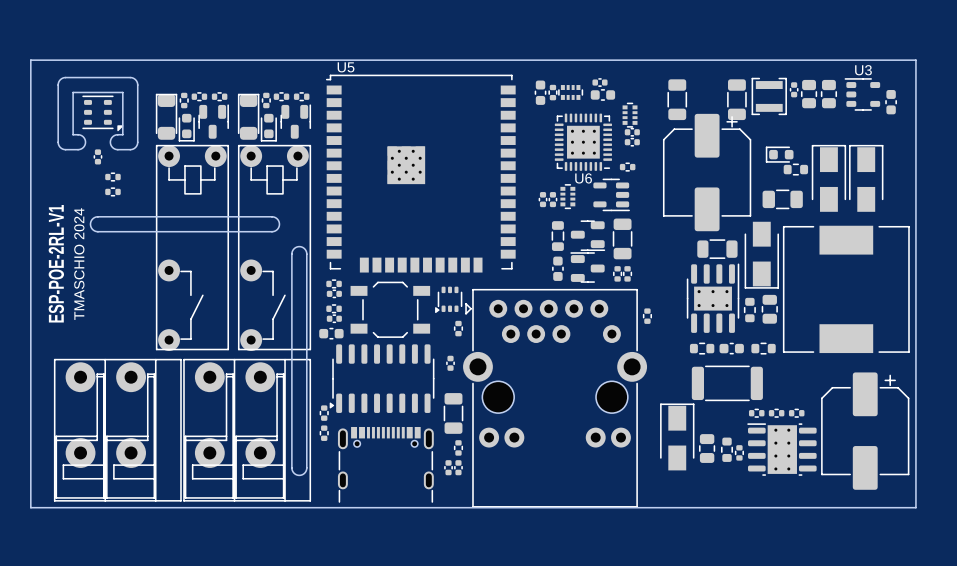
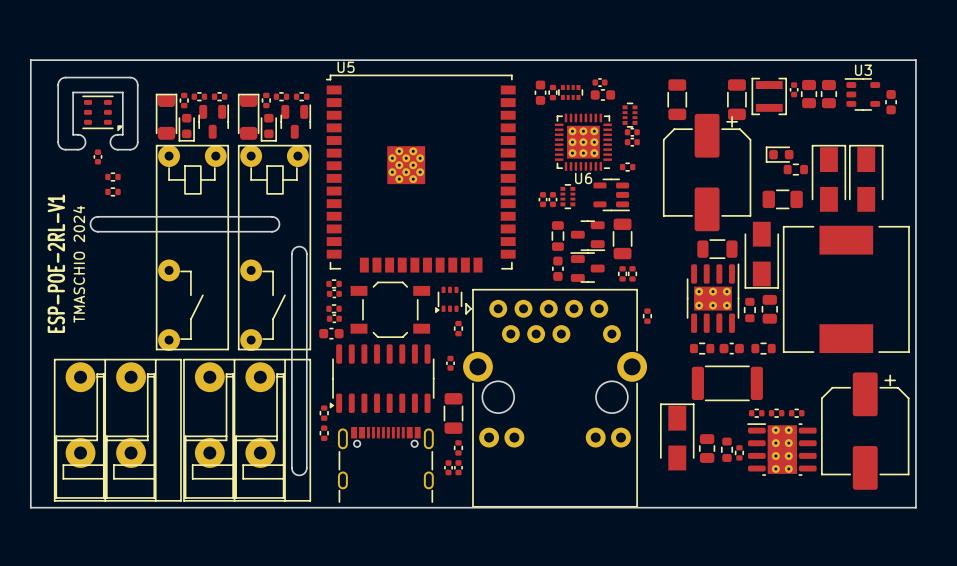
part: (617, 273) -> none
part: none -> (622, 273)
part: (627, 273) -> none
part: none -> (632, 273)

